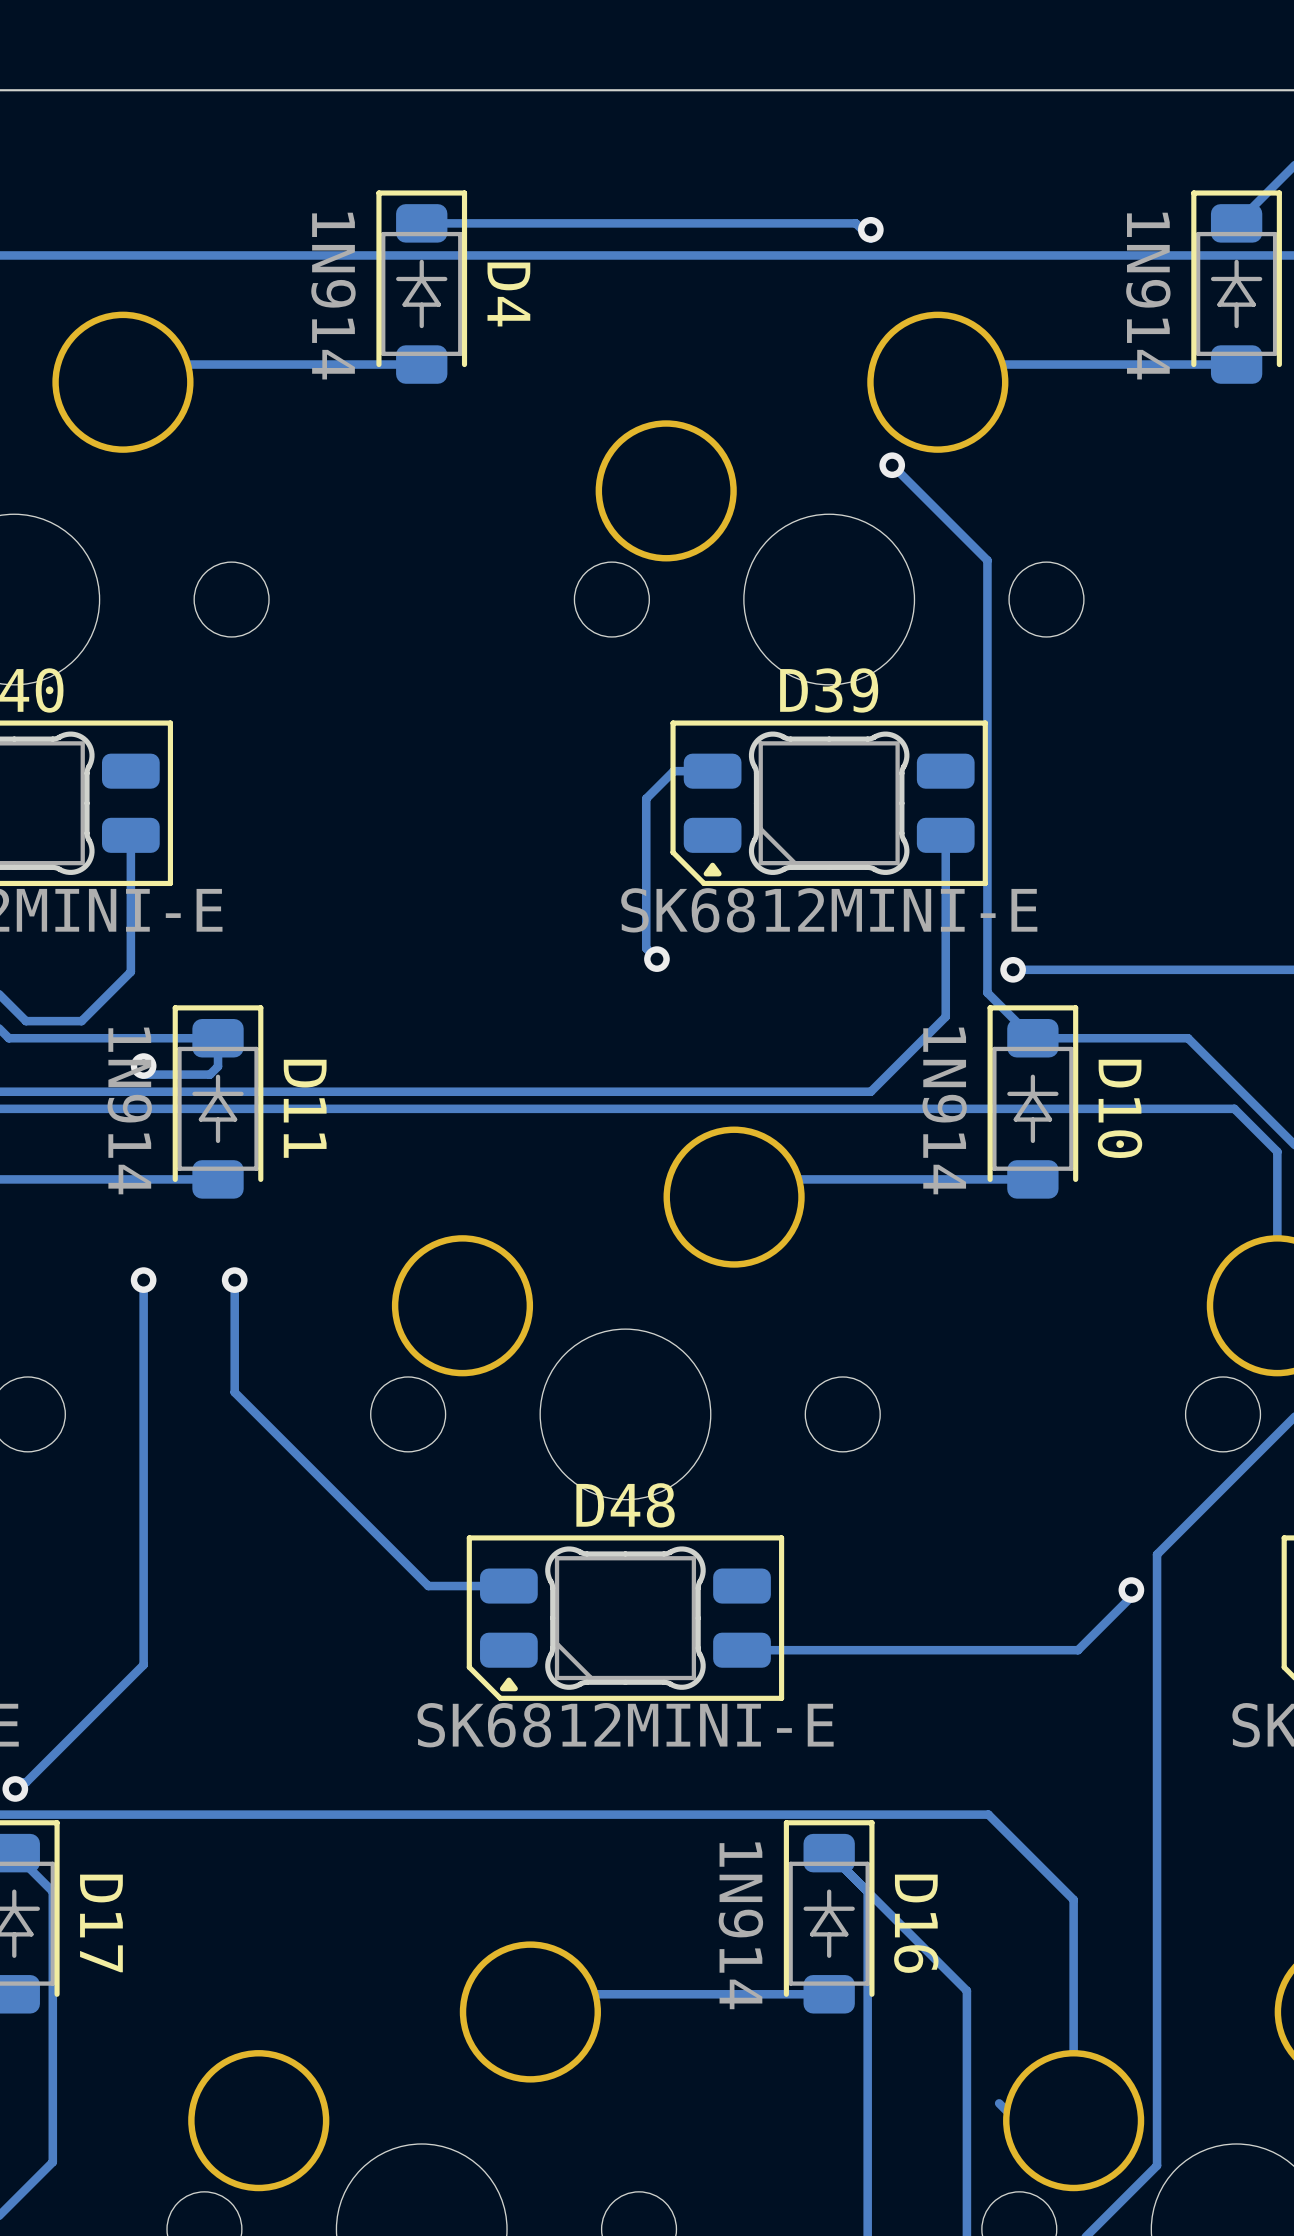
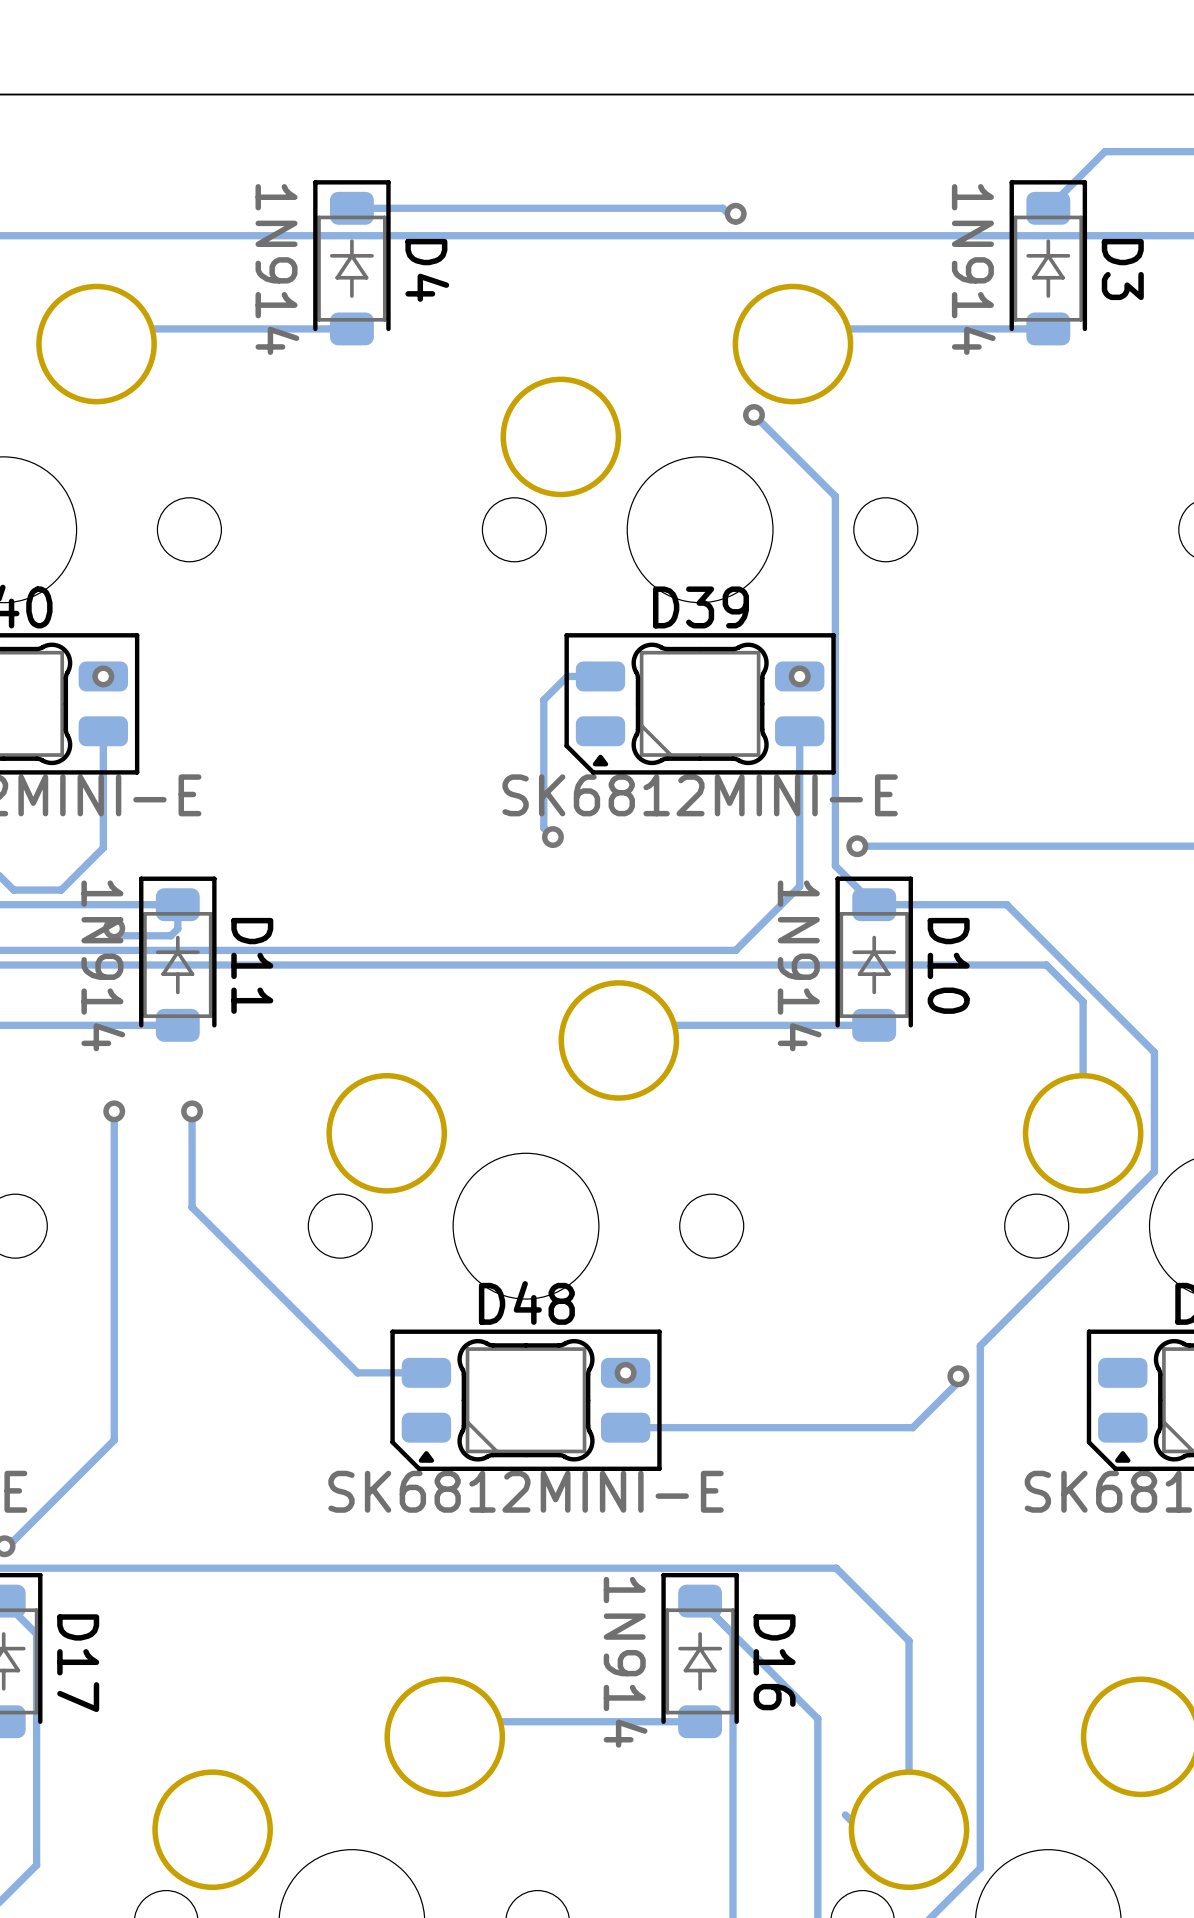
via: none -> (103, 676)
via: none -> (799, 676)
via: none -> (625, 1372)

